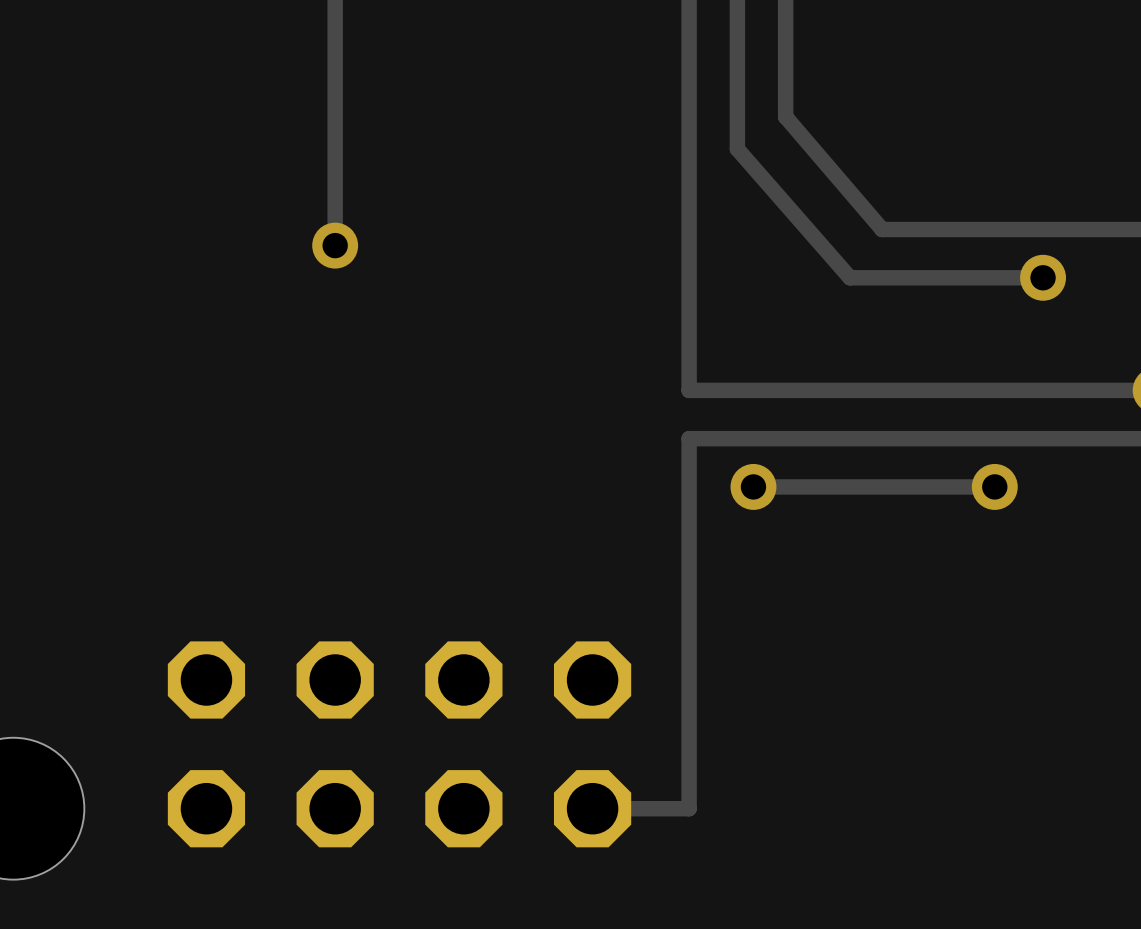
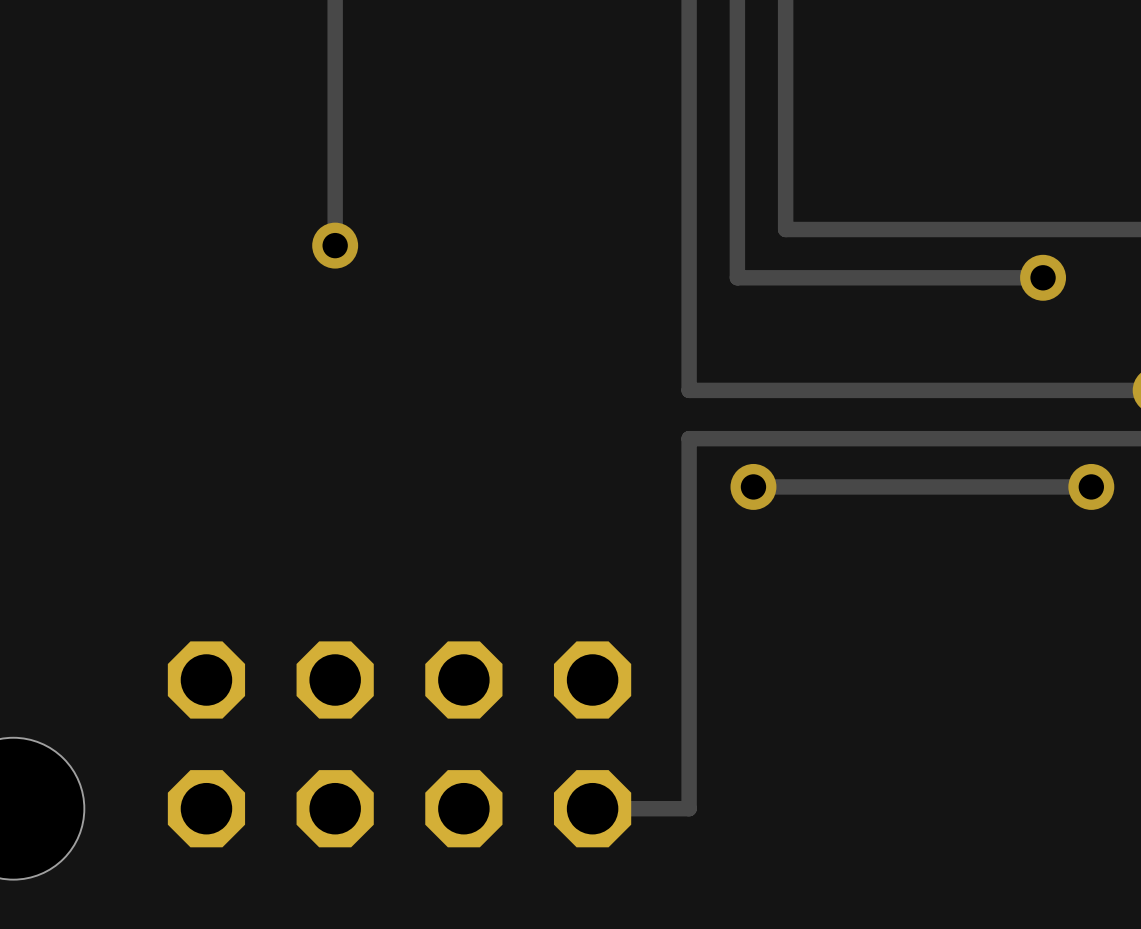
track: (785, 116) (882, 229) -> (785, 116) (785, 229) (882, 229)
track: (737, 149) (849, 277) -> (737, 149) (737, 277) (849, 277)
via position: (994, 486) -> (1091, 486)
track: none -> (1091, 486) (994, 486)

